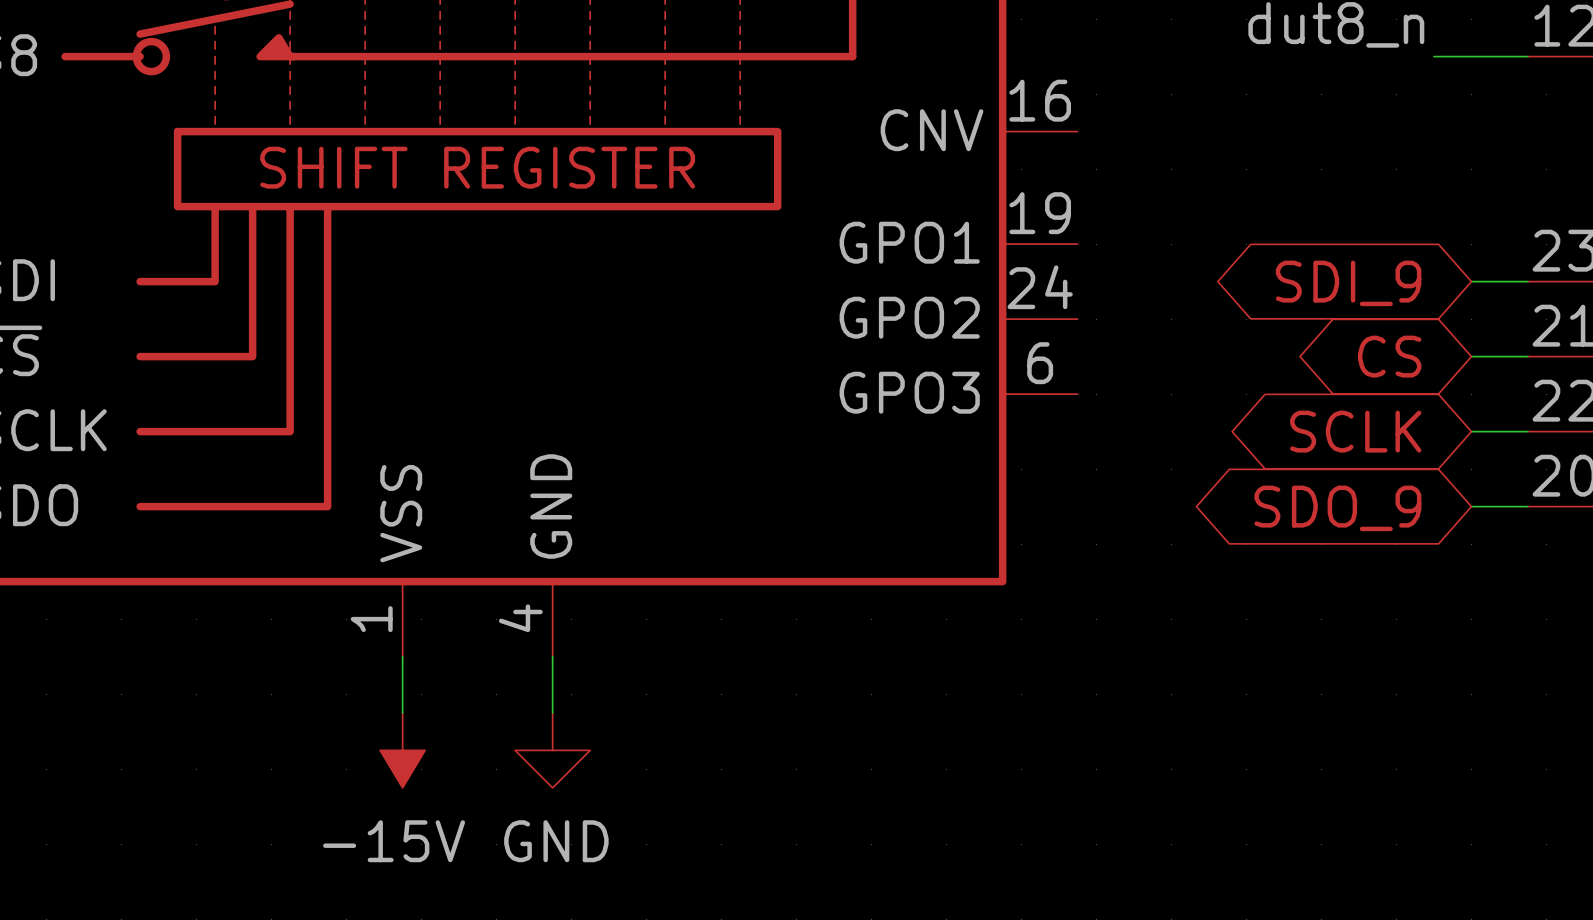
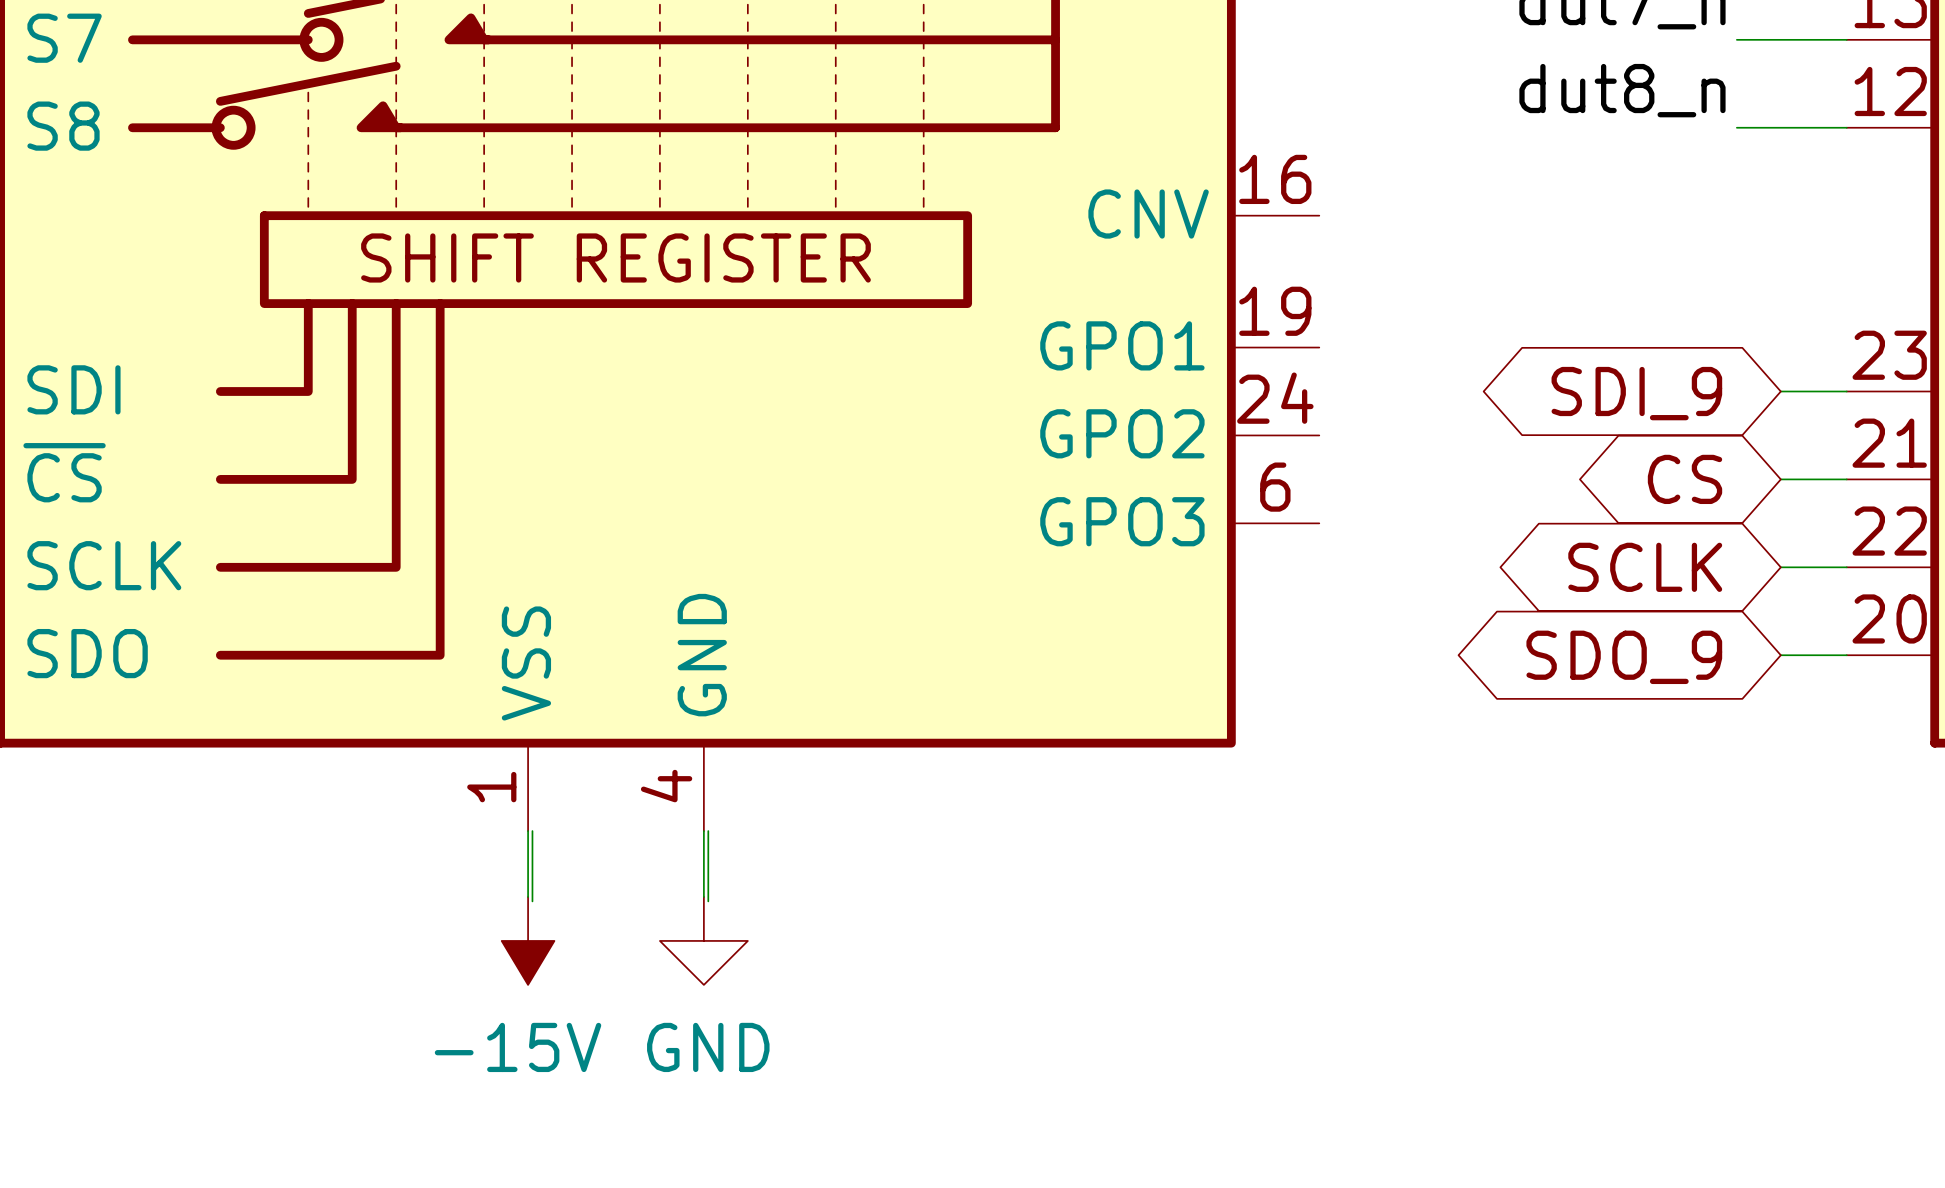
wire: none -> (532, 831) (532, 901)
wire: none -> (708, 831) (708, 901)

